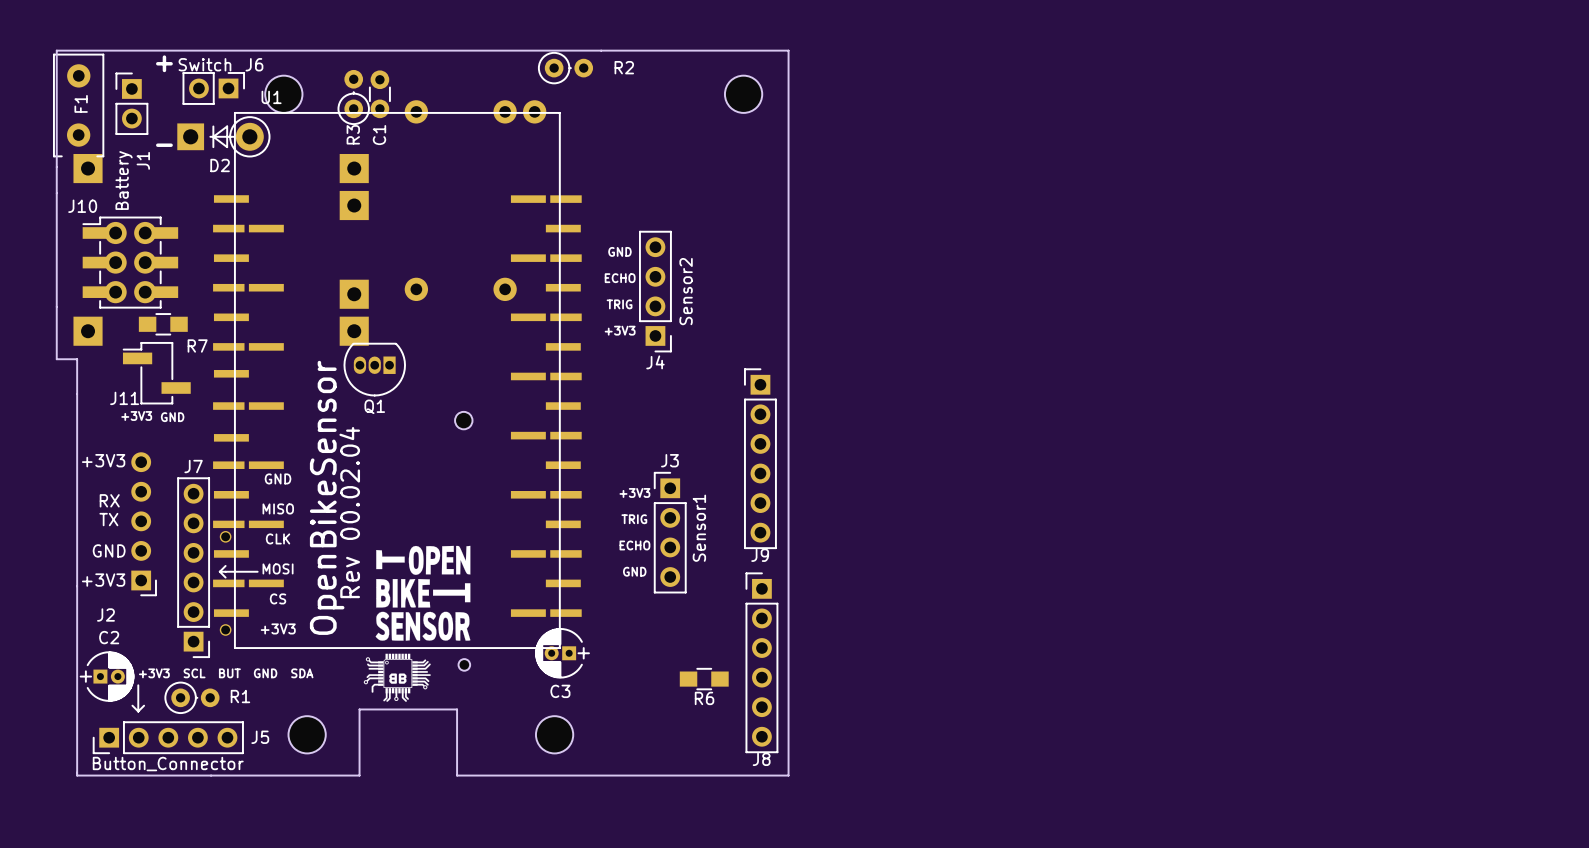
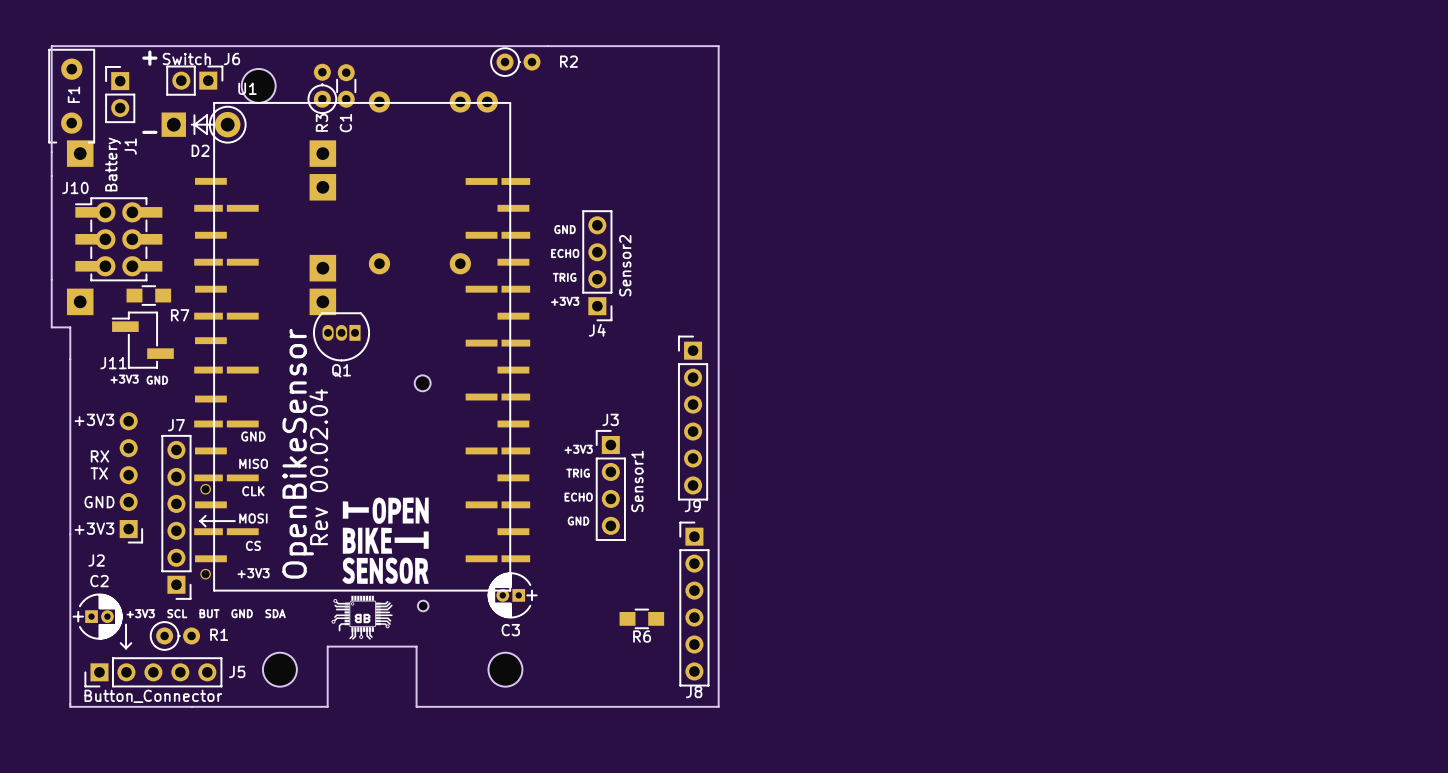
part: (743, 94) -> none

